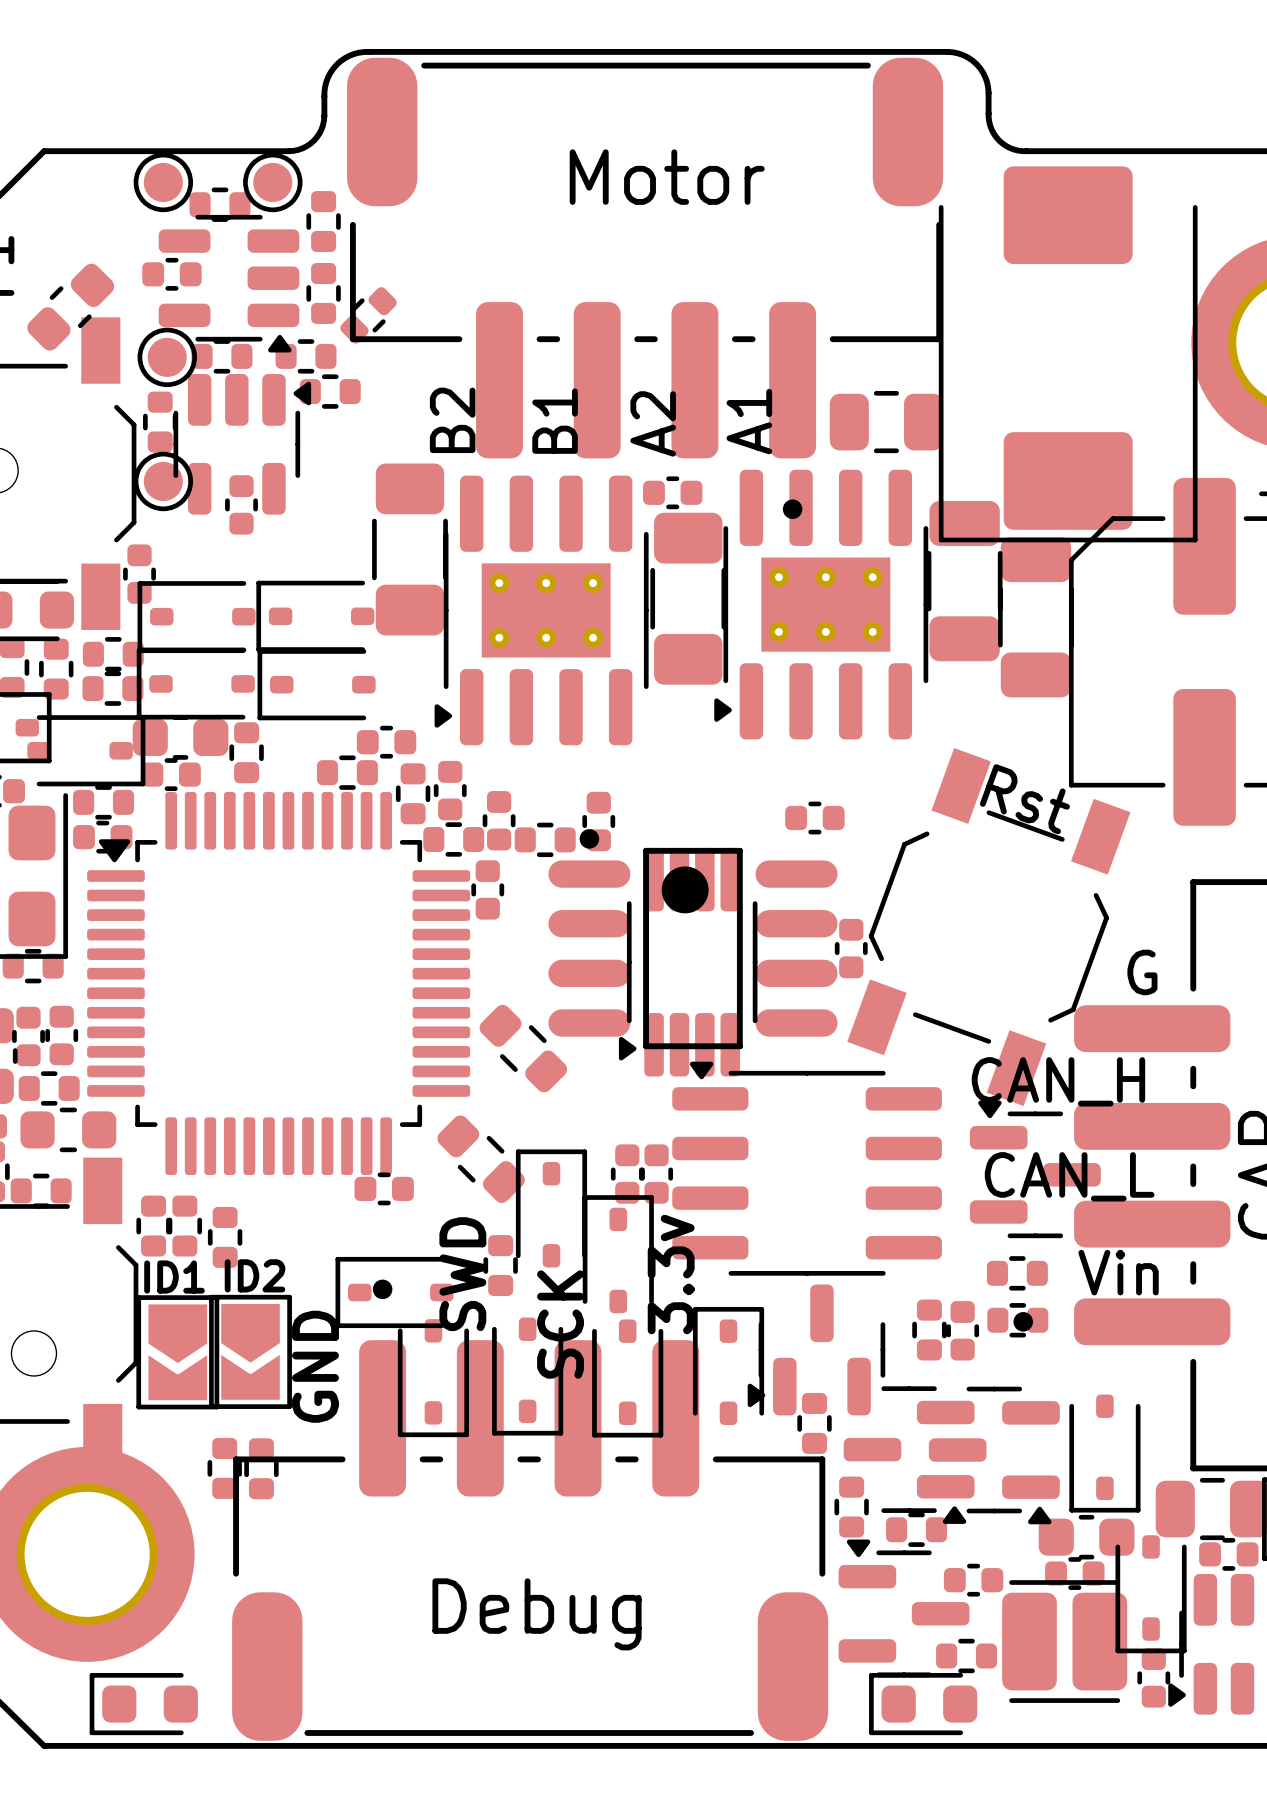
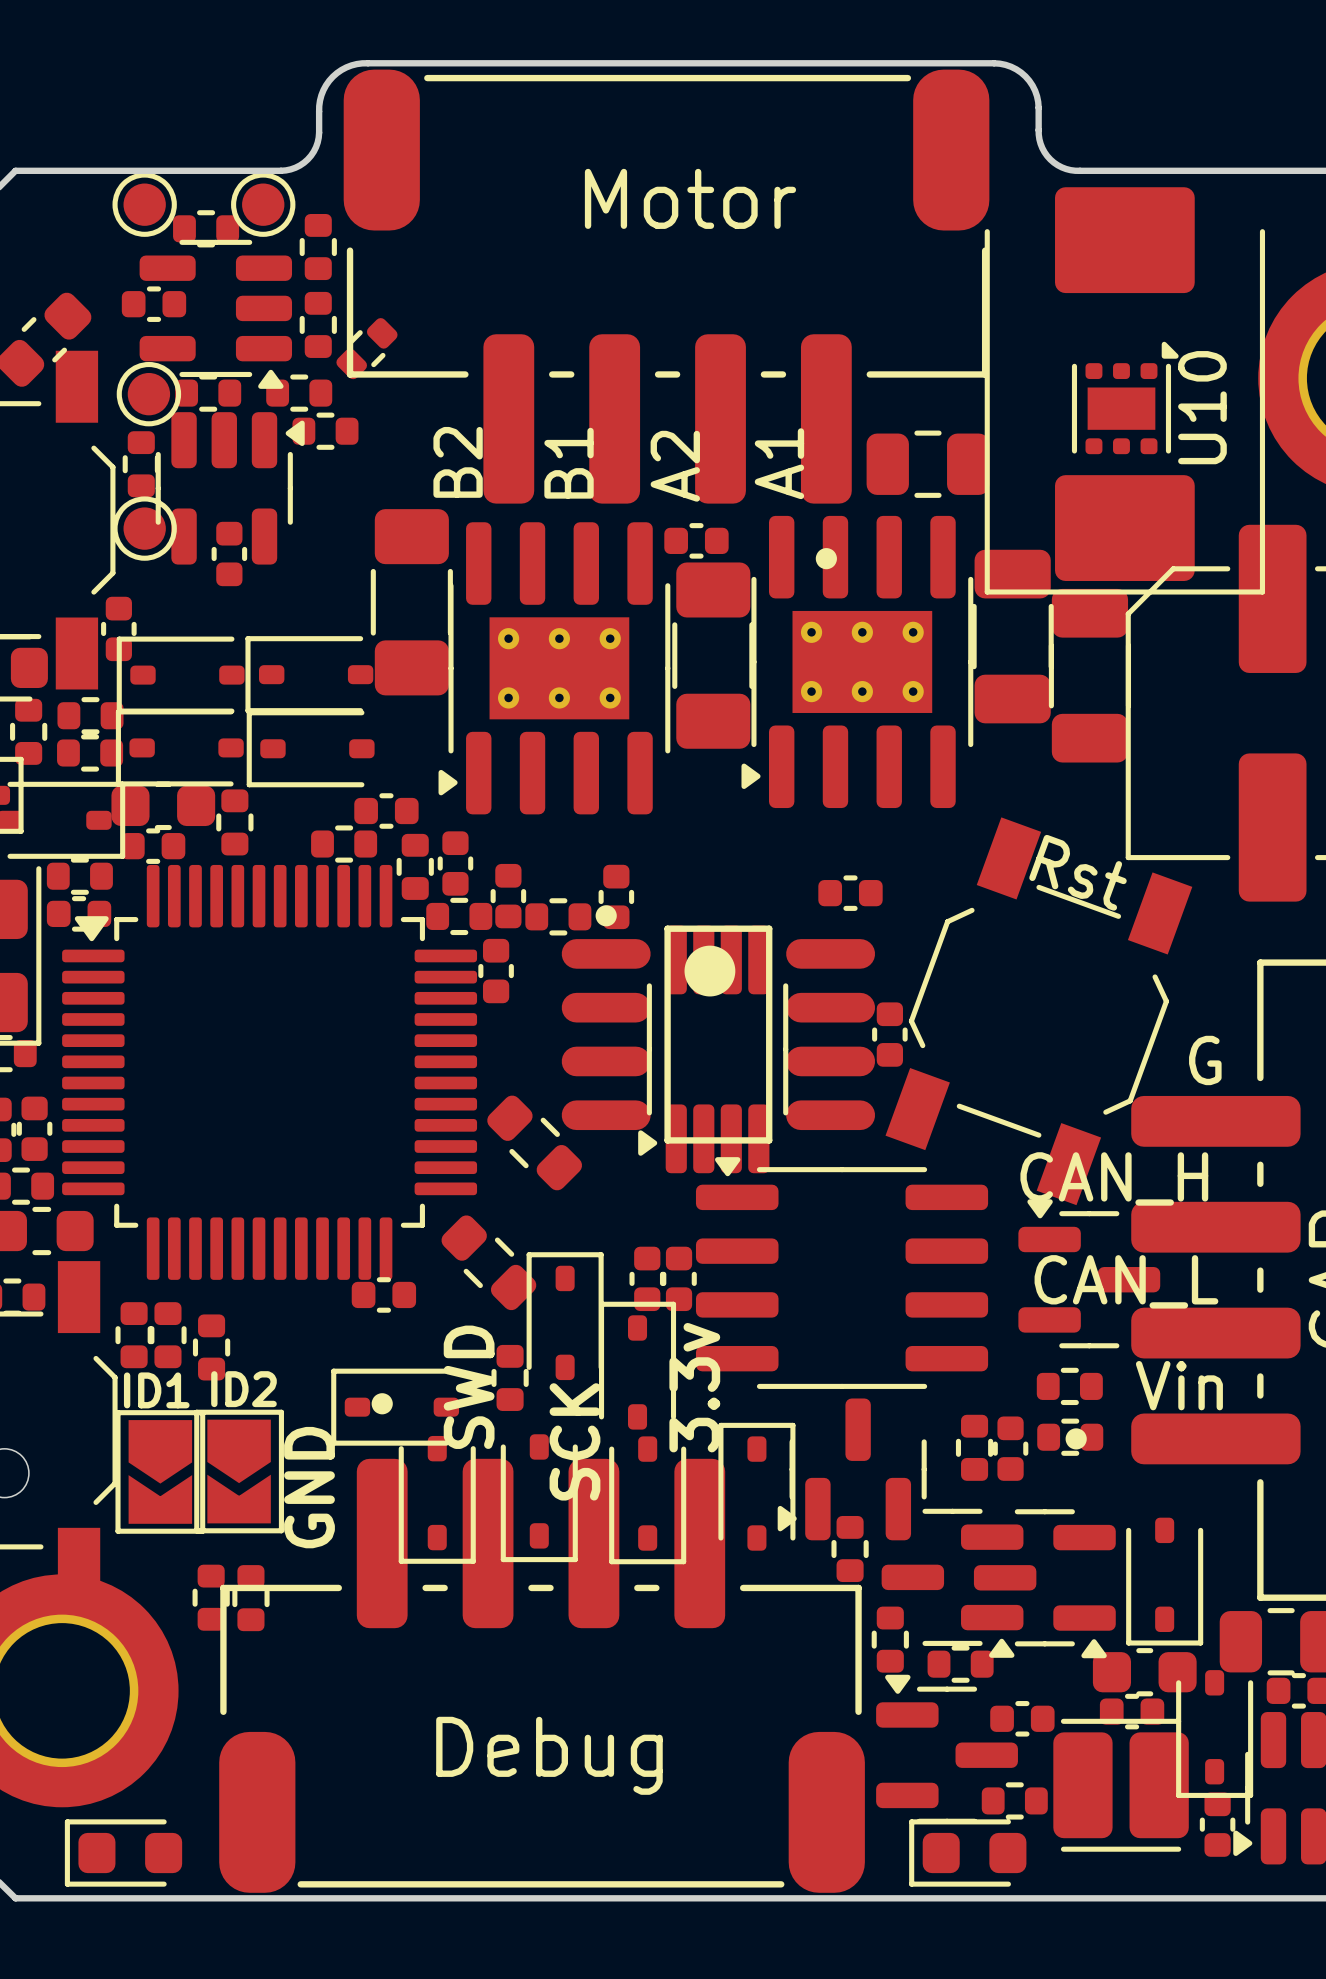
U10: none -> (1125, 397)

